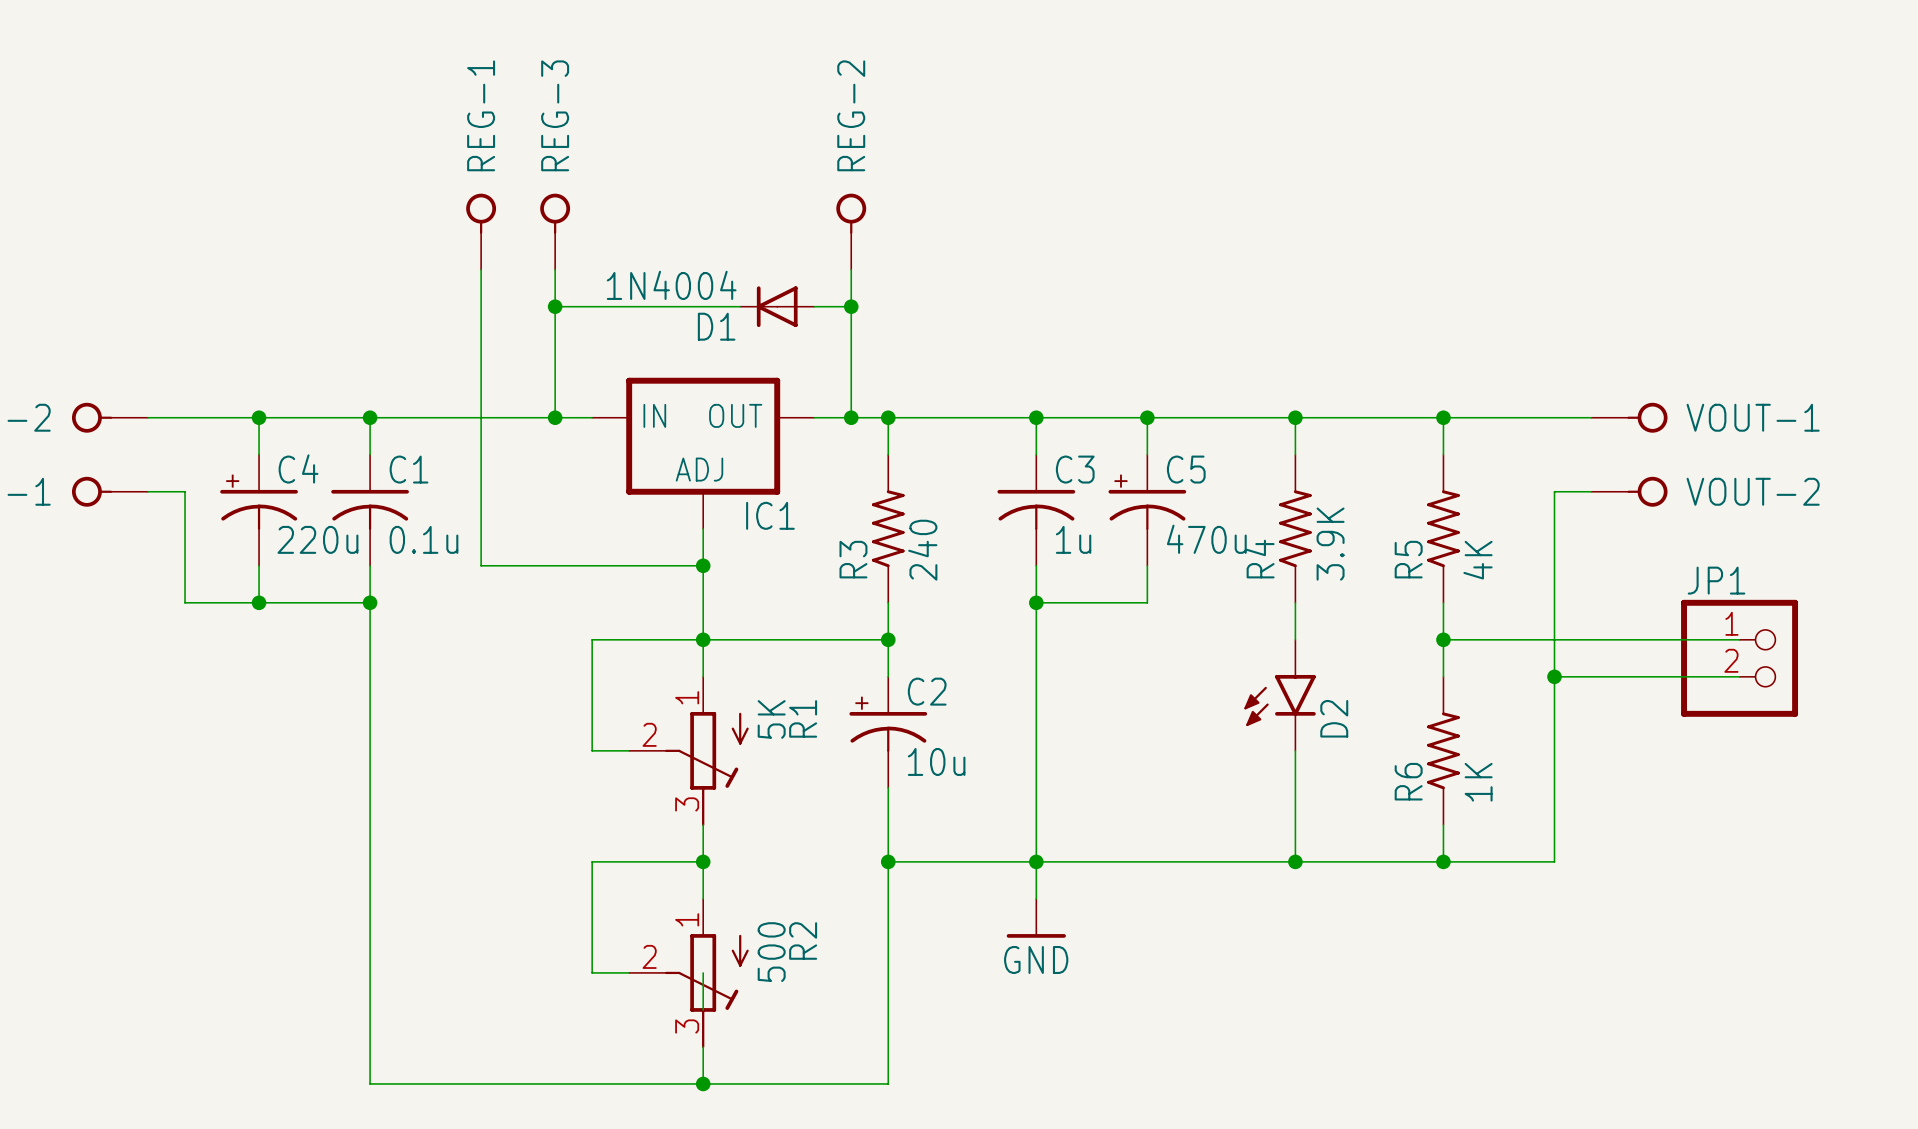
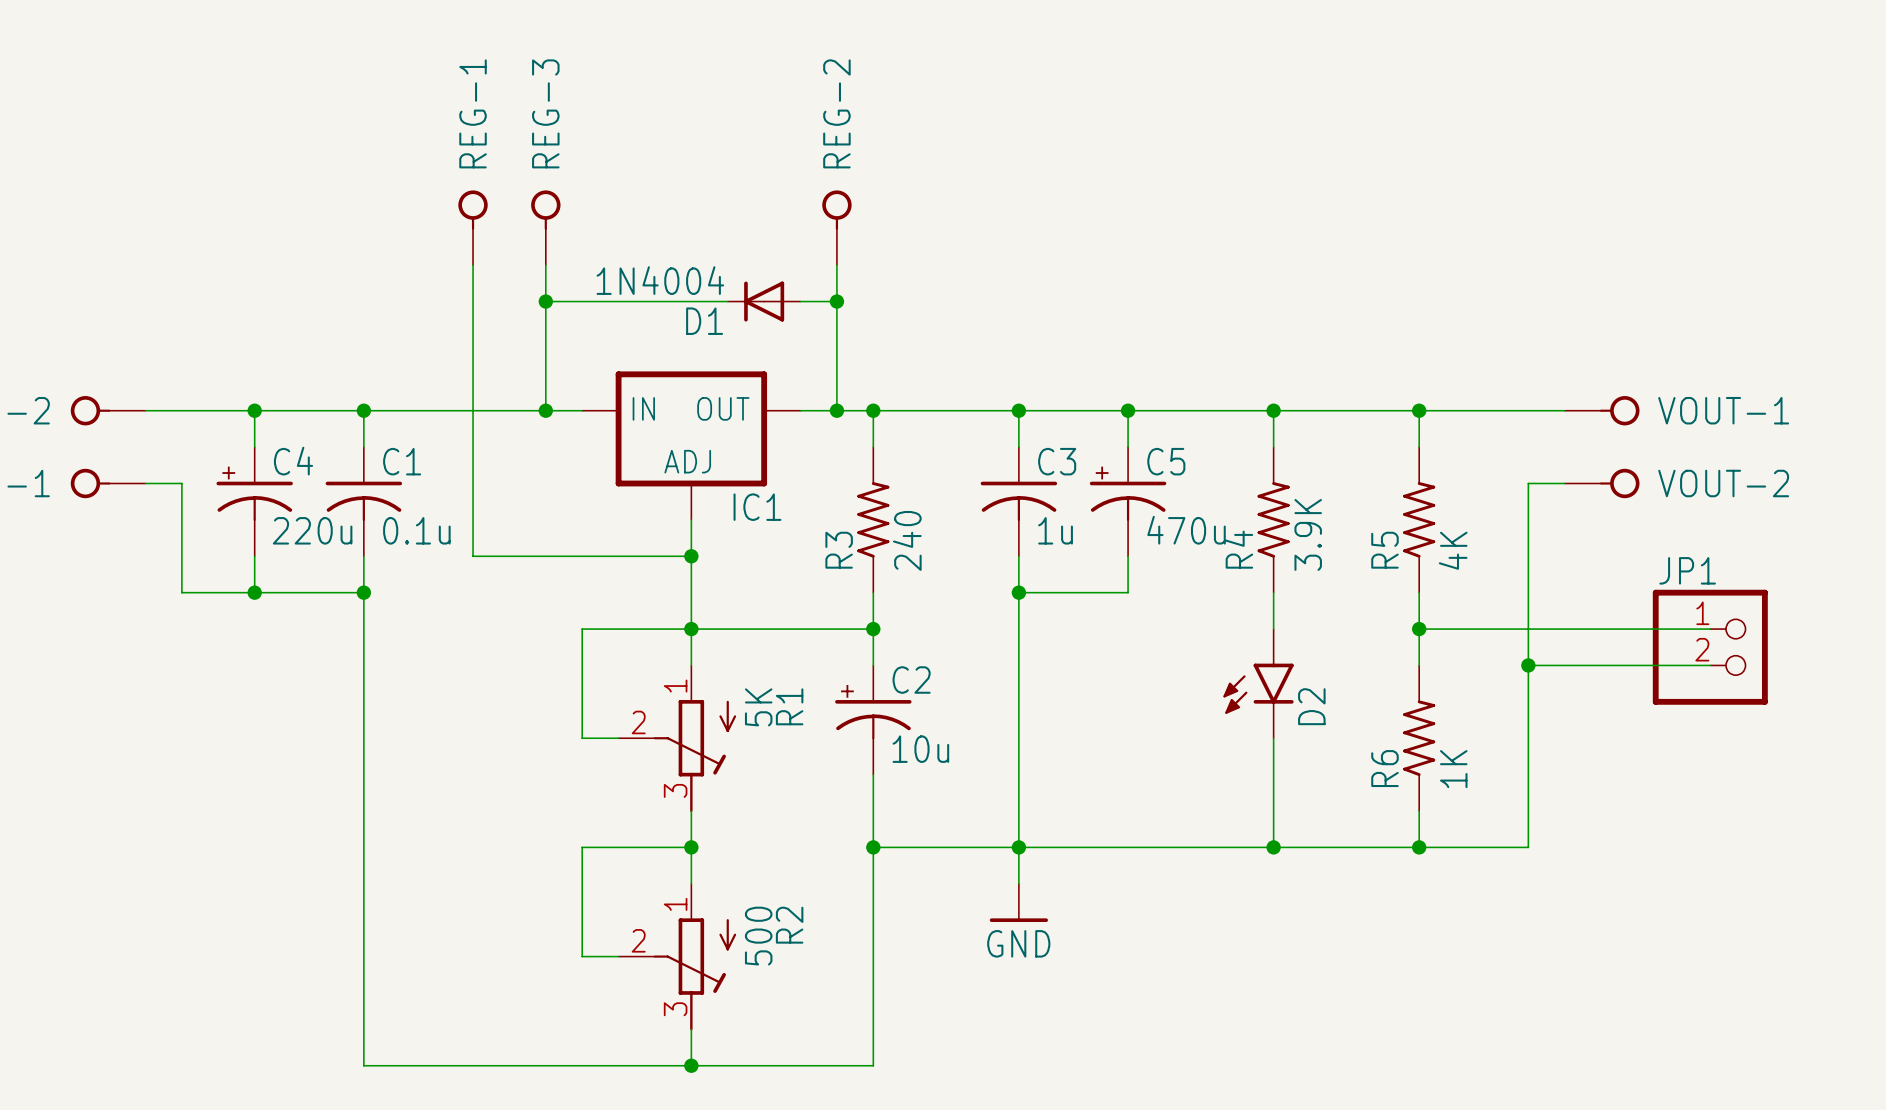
wire: (703, 972) (703, 1009) -> none

